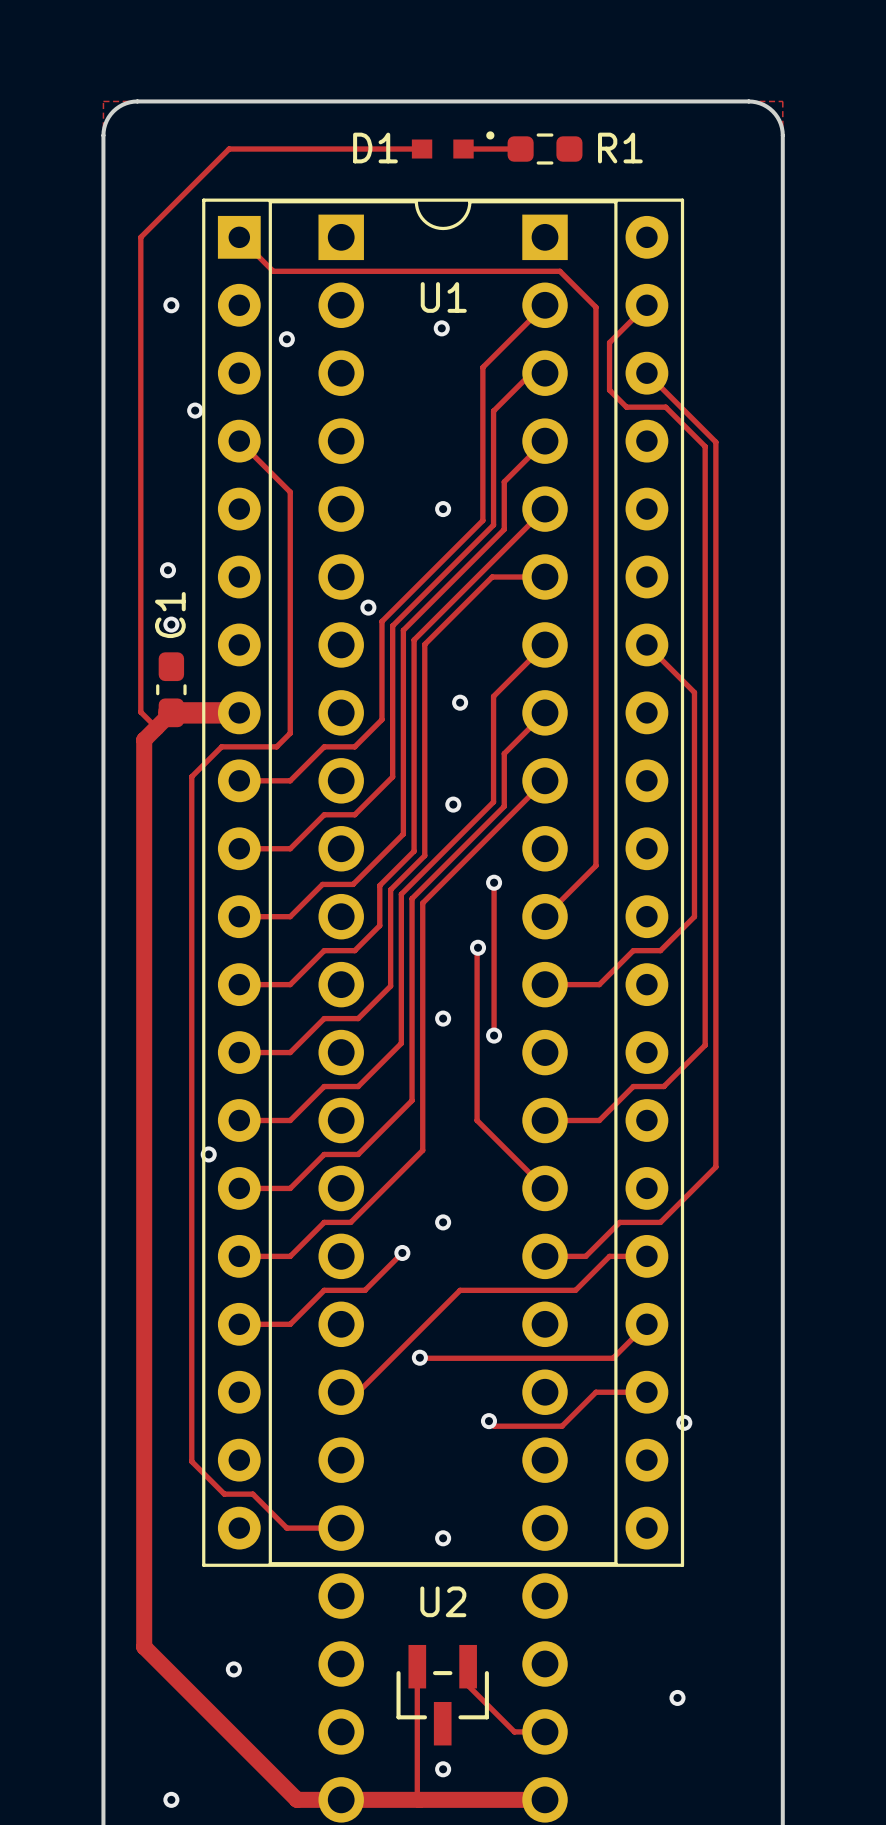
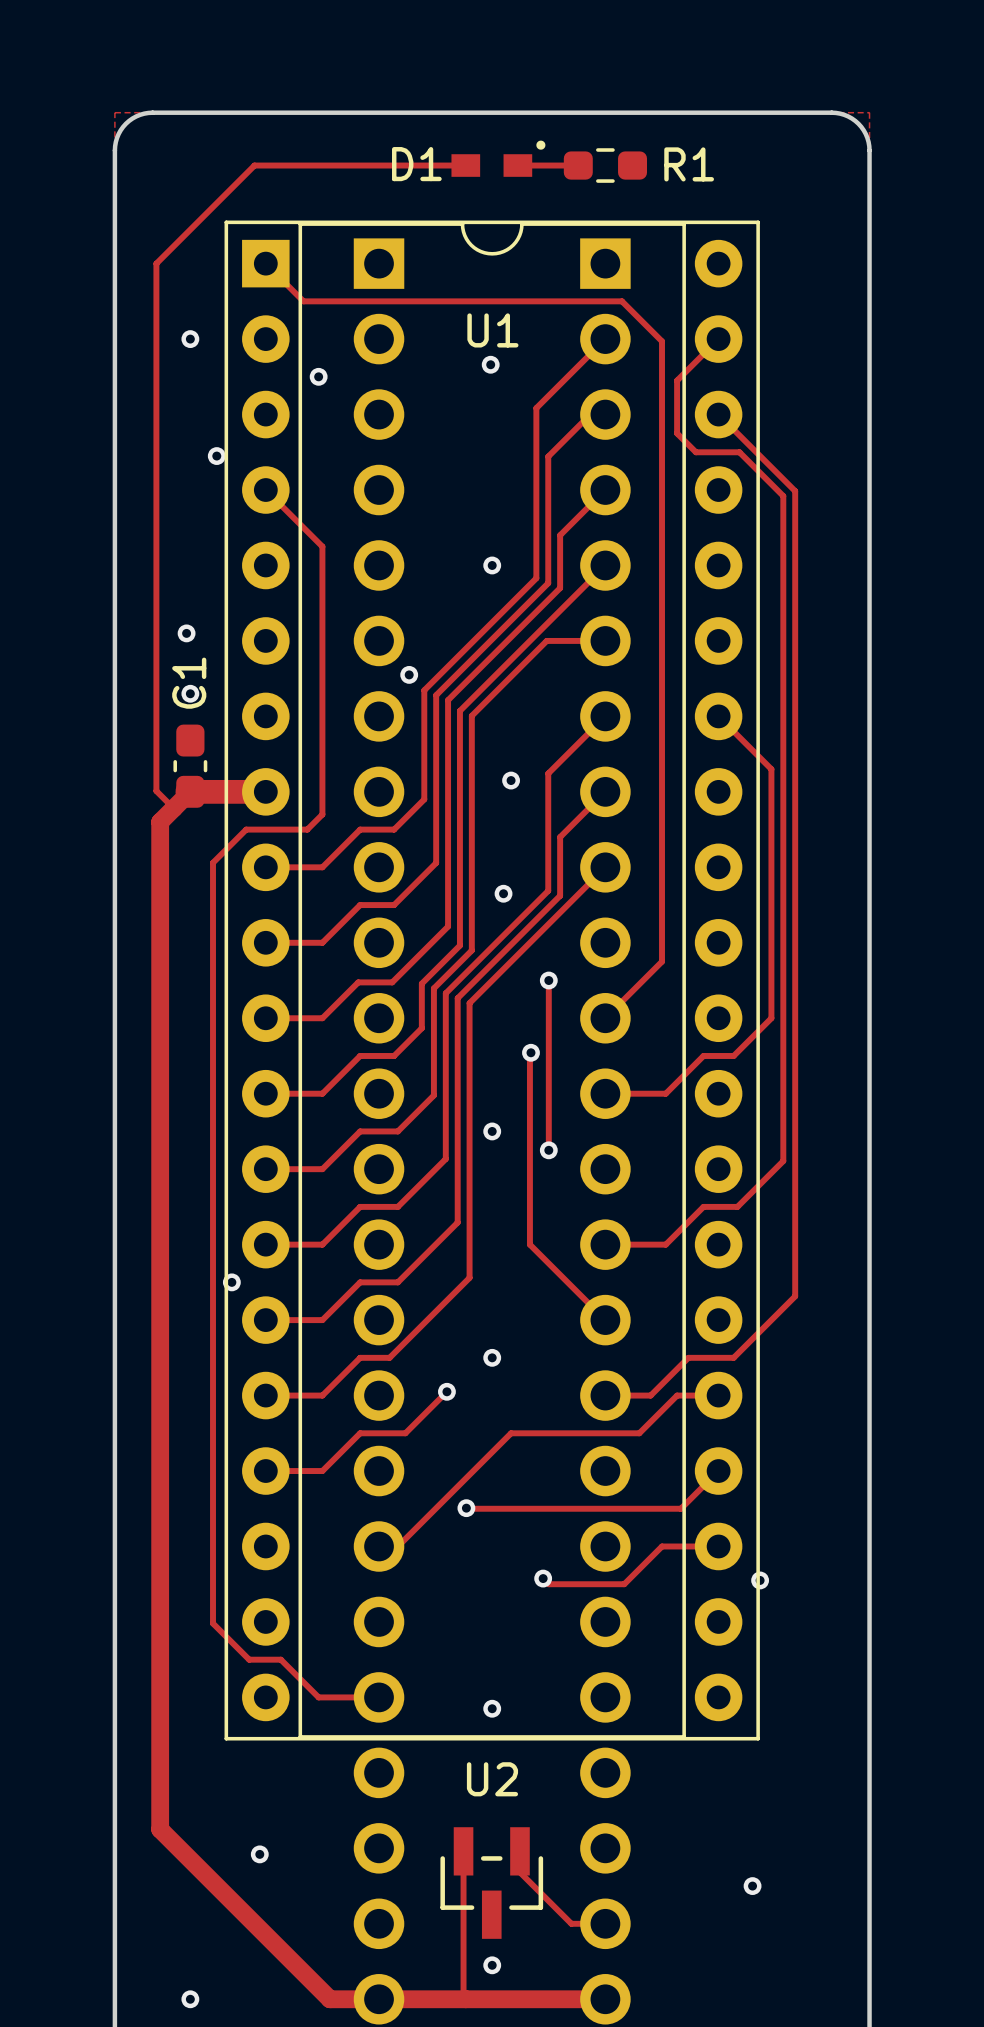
D1 footprint: [411, 131, 495, 159] -> [451, 140, 546, 177]

